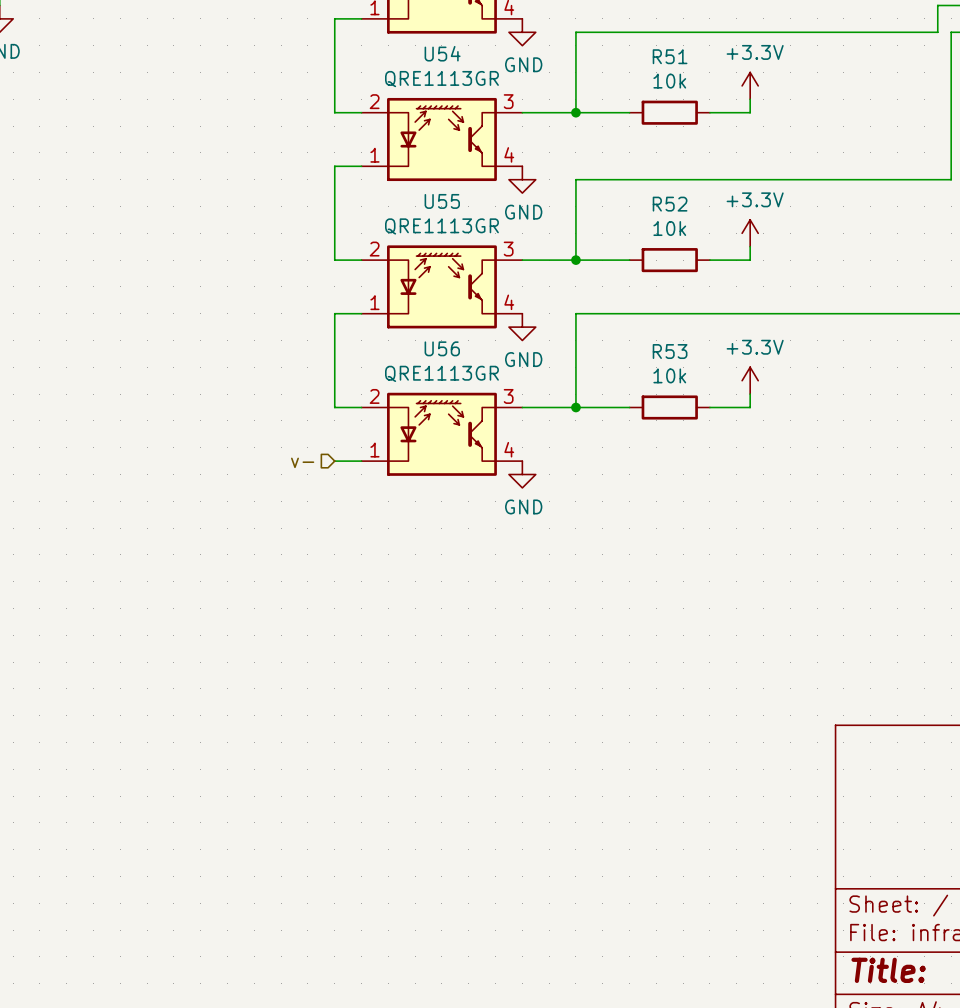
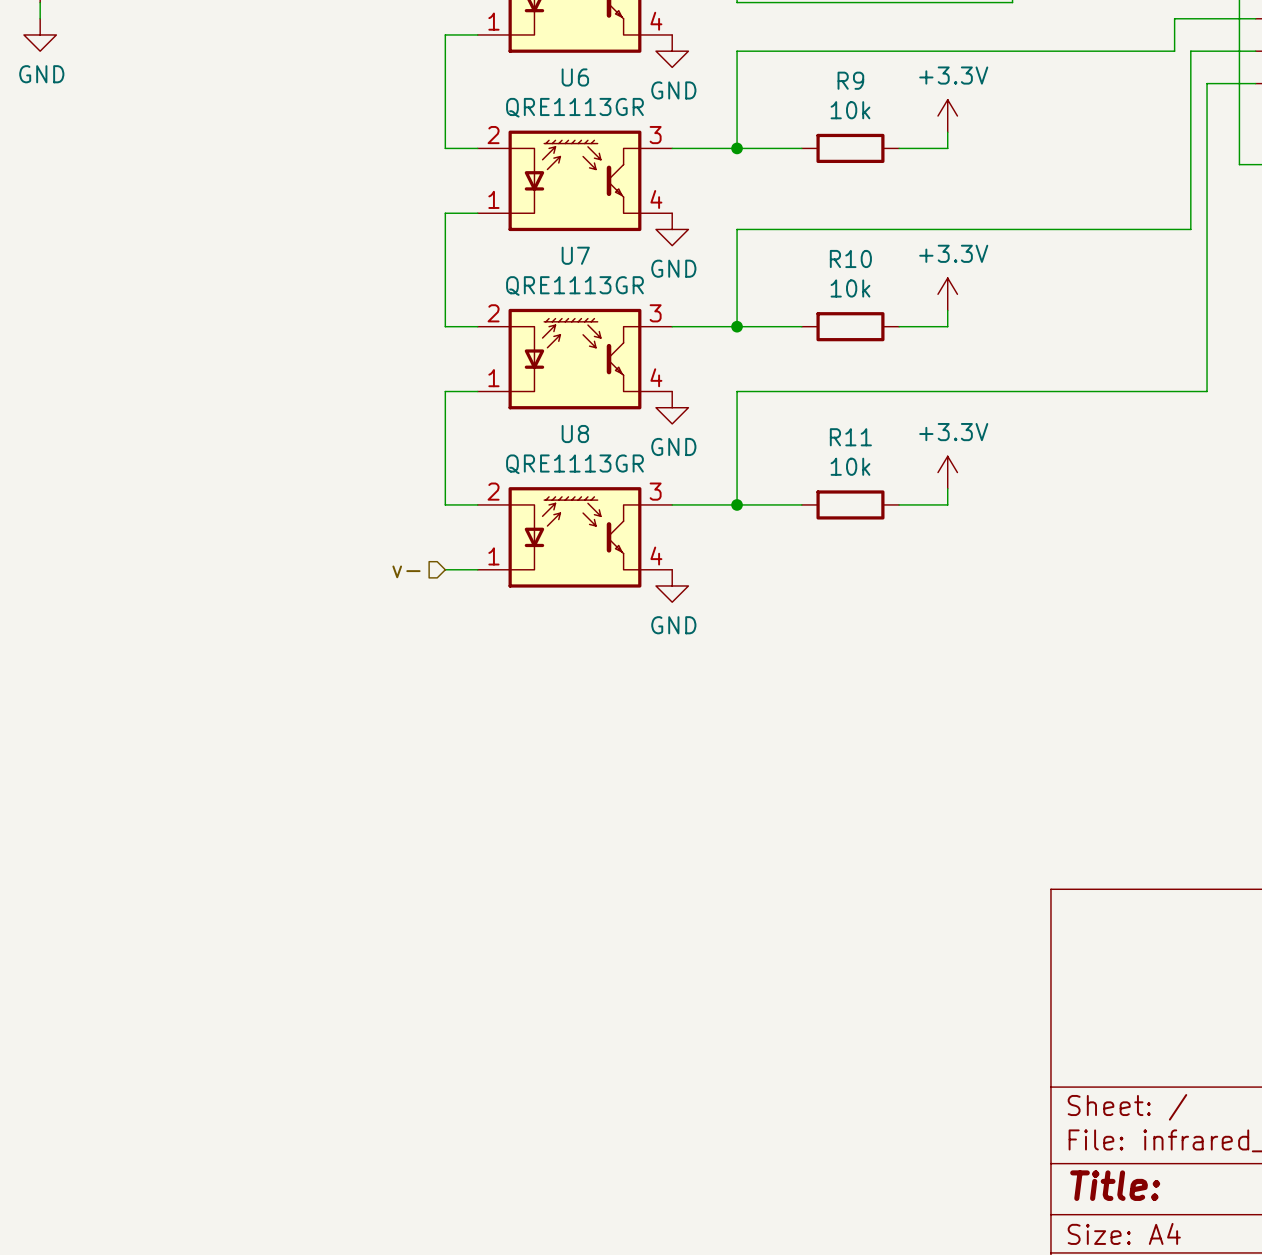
U54 name: U54 (442, 53) -> U6 (575, 77)
R51 name: R51 (670, 56) -> R9 (850, 80)
U55 name: U55 (442, 201) -> U7 (575, 255)
R52 name: R52 (670, 204) -> R10 (850, 258)
U56 name: U56 (442, 348) -> U8 (575, 434)
R53 name: R53 (670, 351) -> R11 (850, 437)

